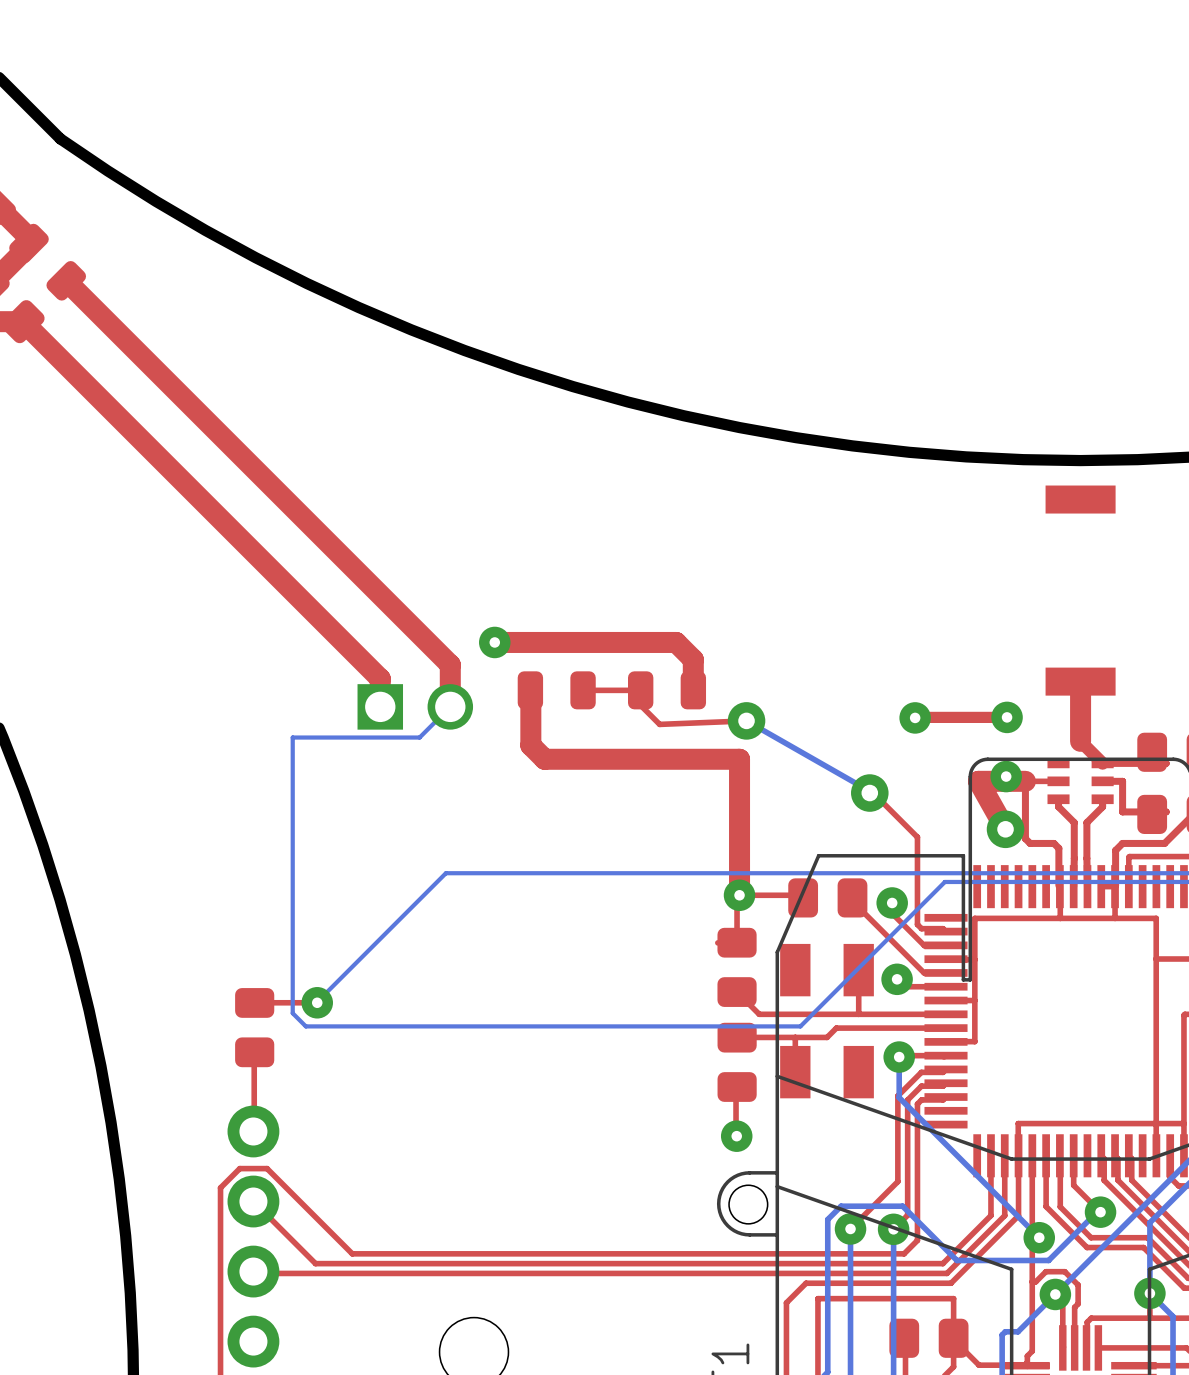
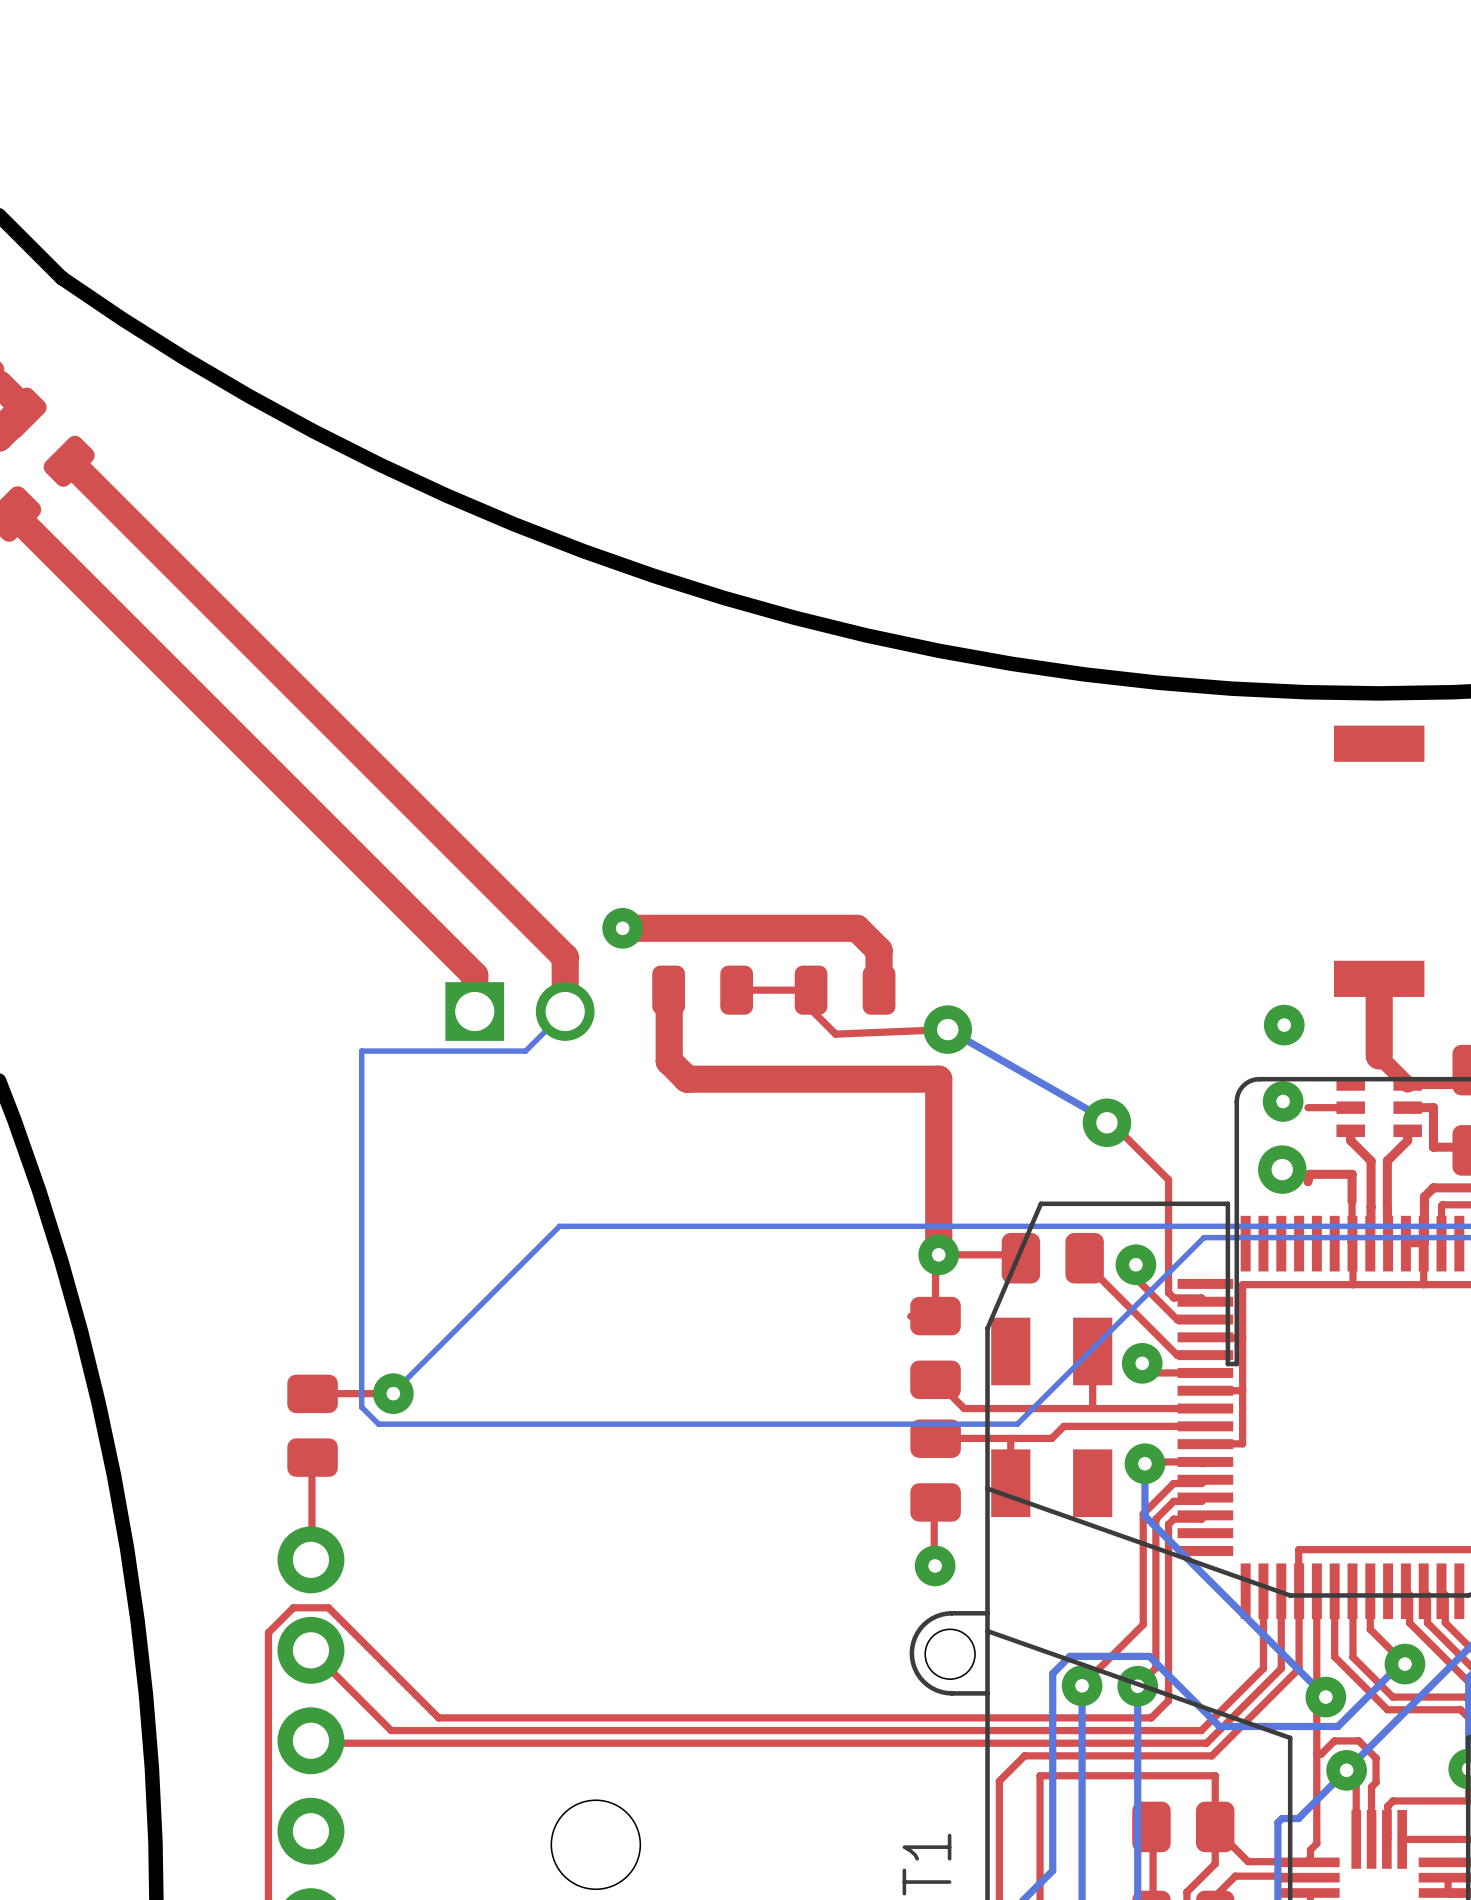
via: (915, 717) -> none
top track: (1007, 717) (915, 717) -> none
top track: (1005, 829) (978, 781) (1025, 781) (1025, 838) (1030, 843) (1053, 843) (1058, 848) (1058, 885) -> (1307, 1181) (1309, 1174) (1352, 1174) (1351, 1242)

